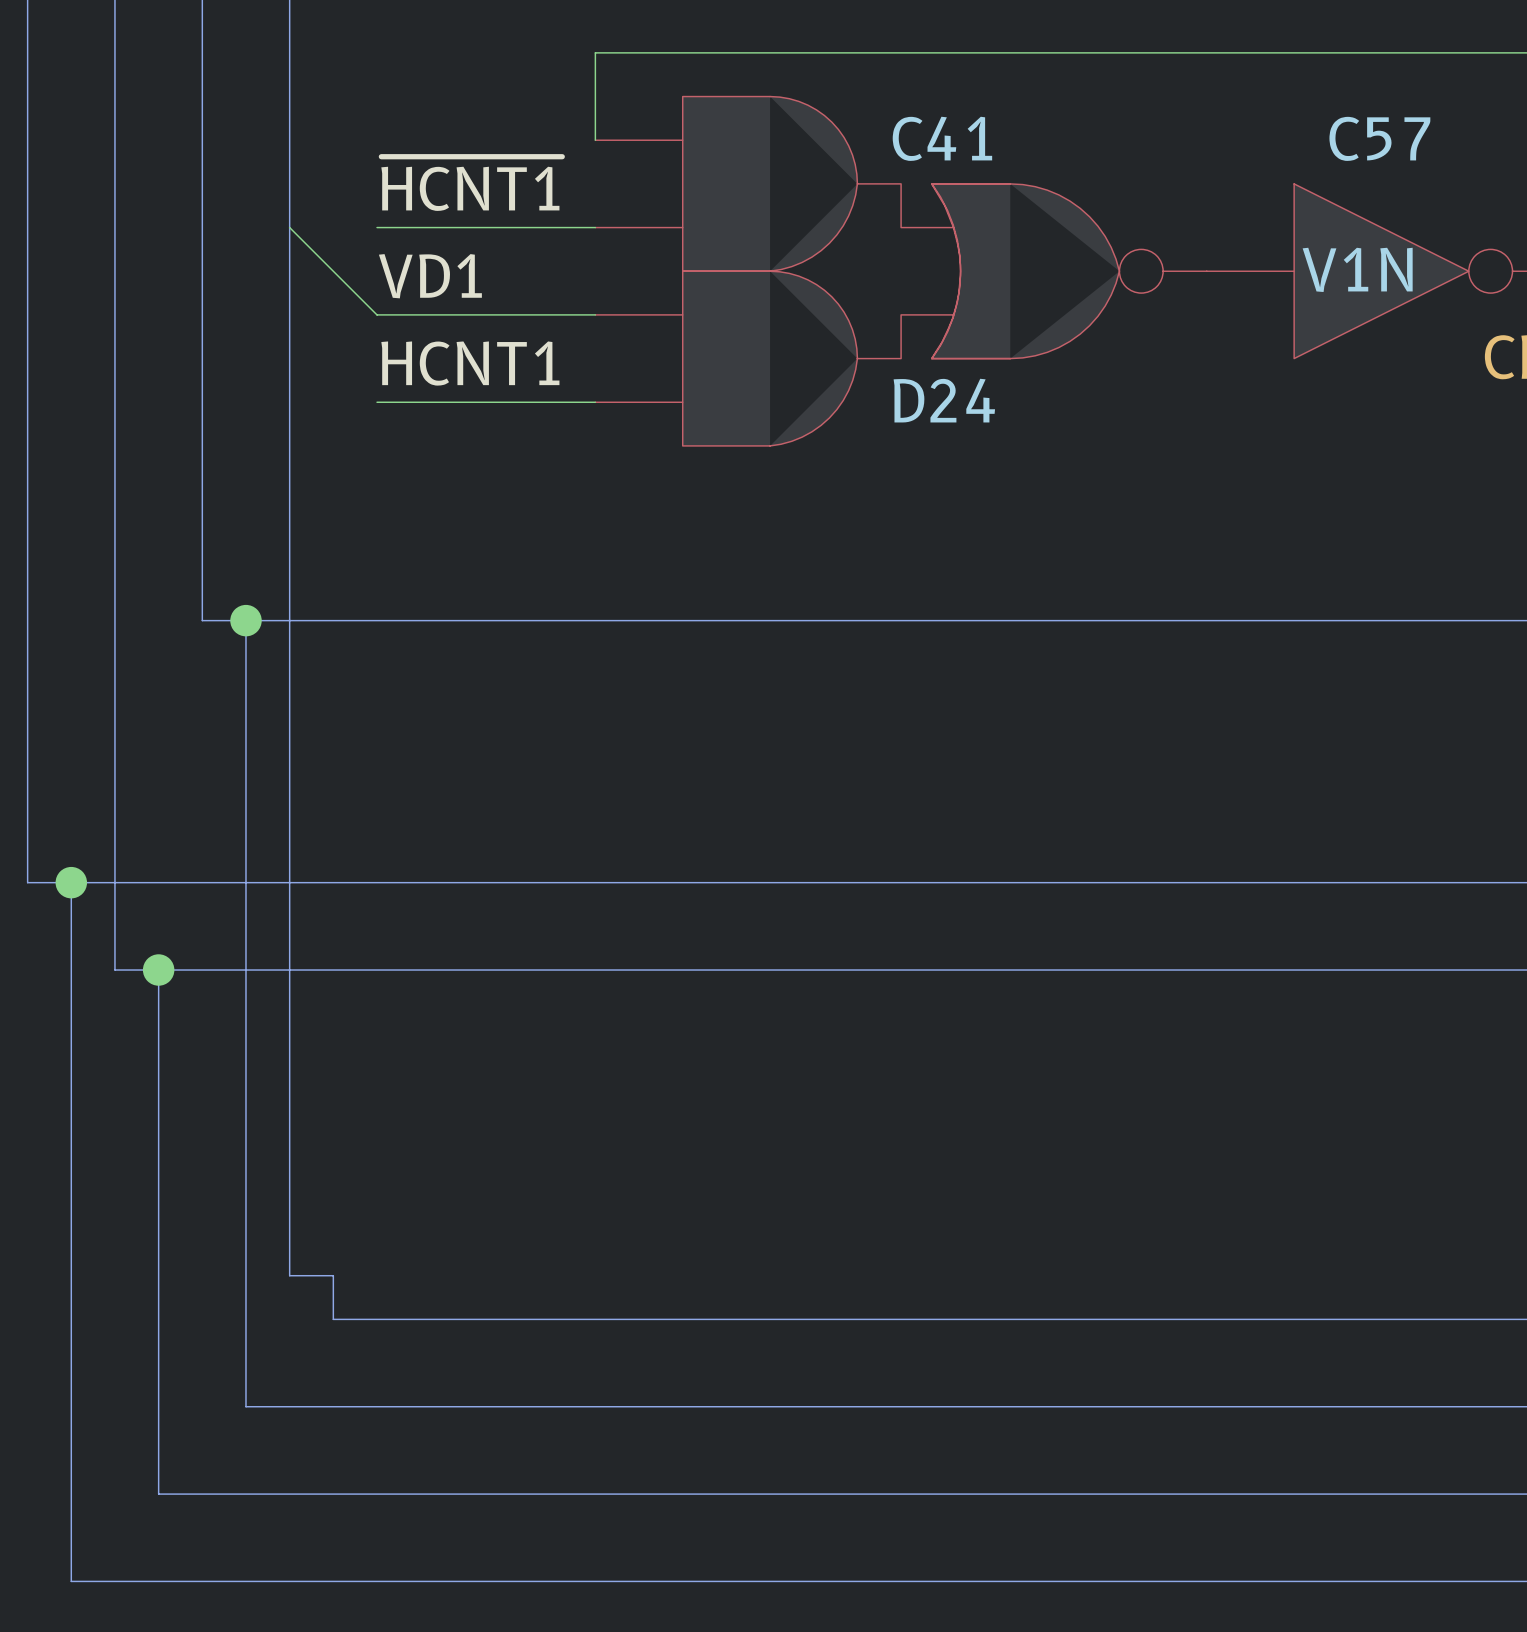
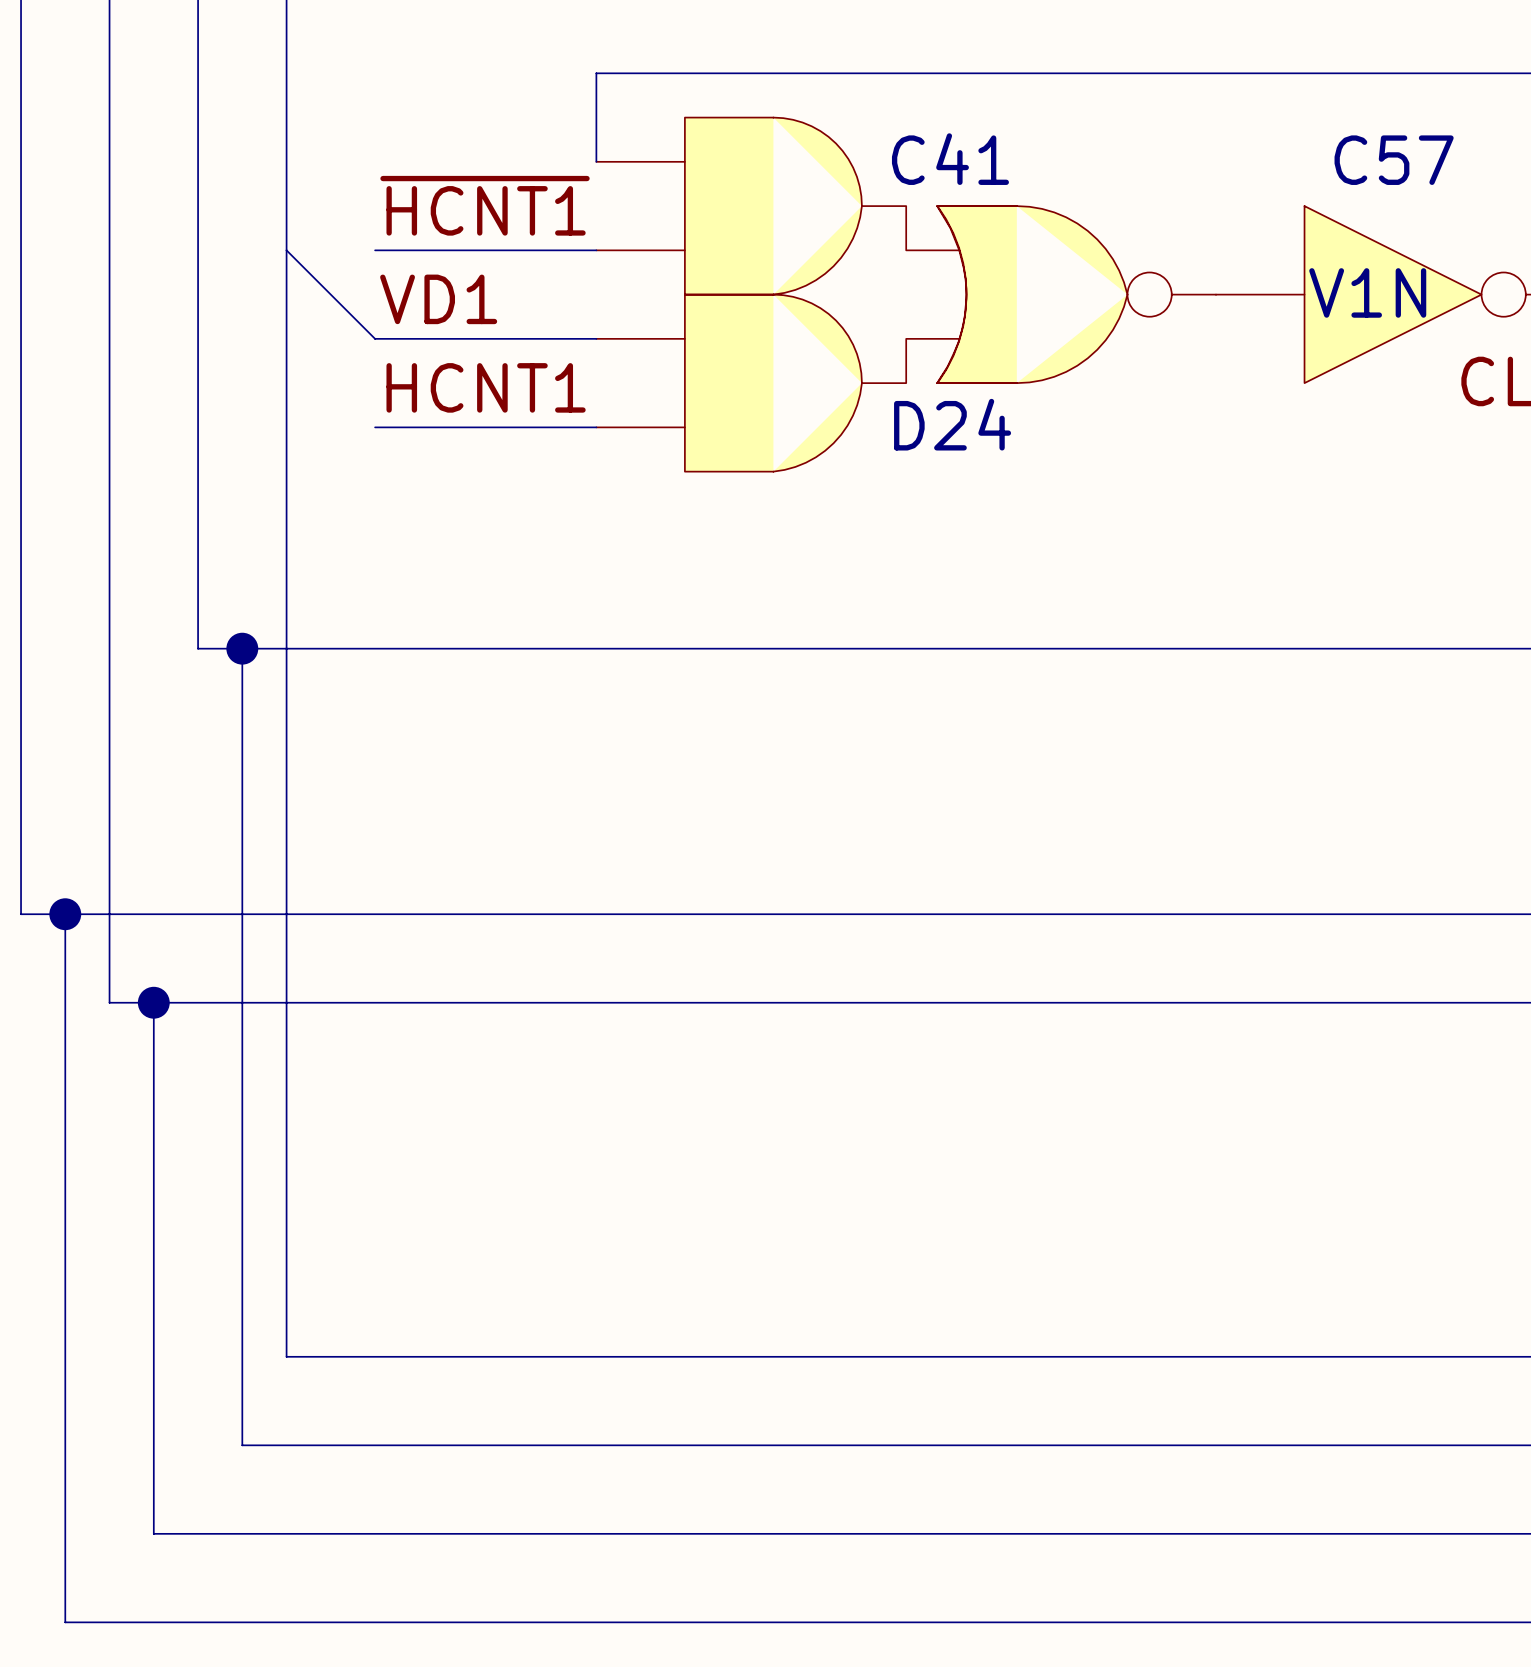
bus: (289, 1275) (333, 1275) (333, 1319) -> (286, 1312) (286, 1356) (330, 1356)

